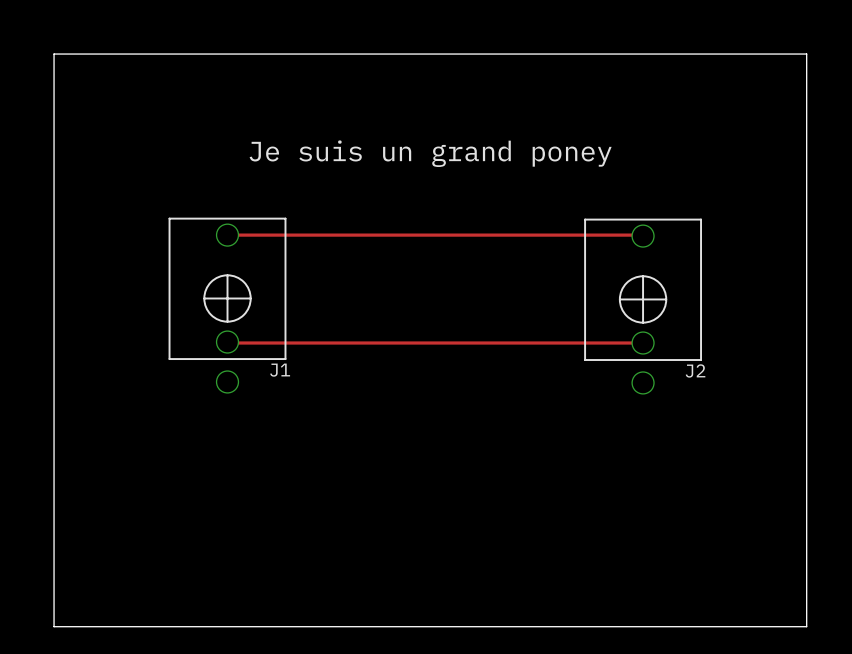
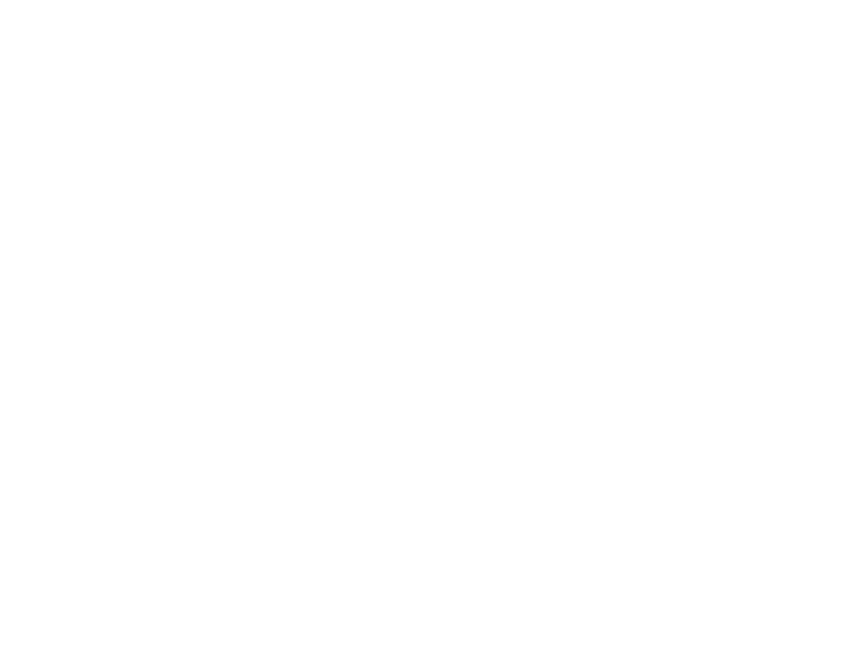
board edge: (54, 54) (54, 626) (806, 626) (806, 54) (54, 54) -> none
text: Je suis un grand poney (430, 153) -> none
track: (227, 235) (643, 236) -> none
J1: (227, 305) -> none
J2: (643, 306) -> none
track: (227, 342) (643, 343) -> none

